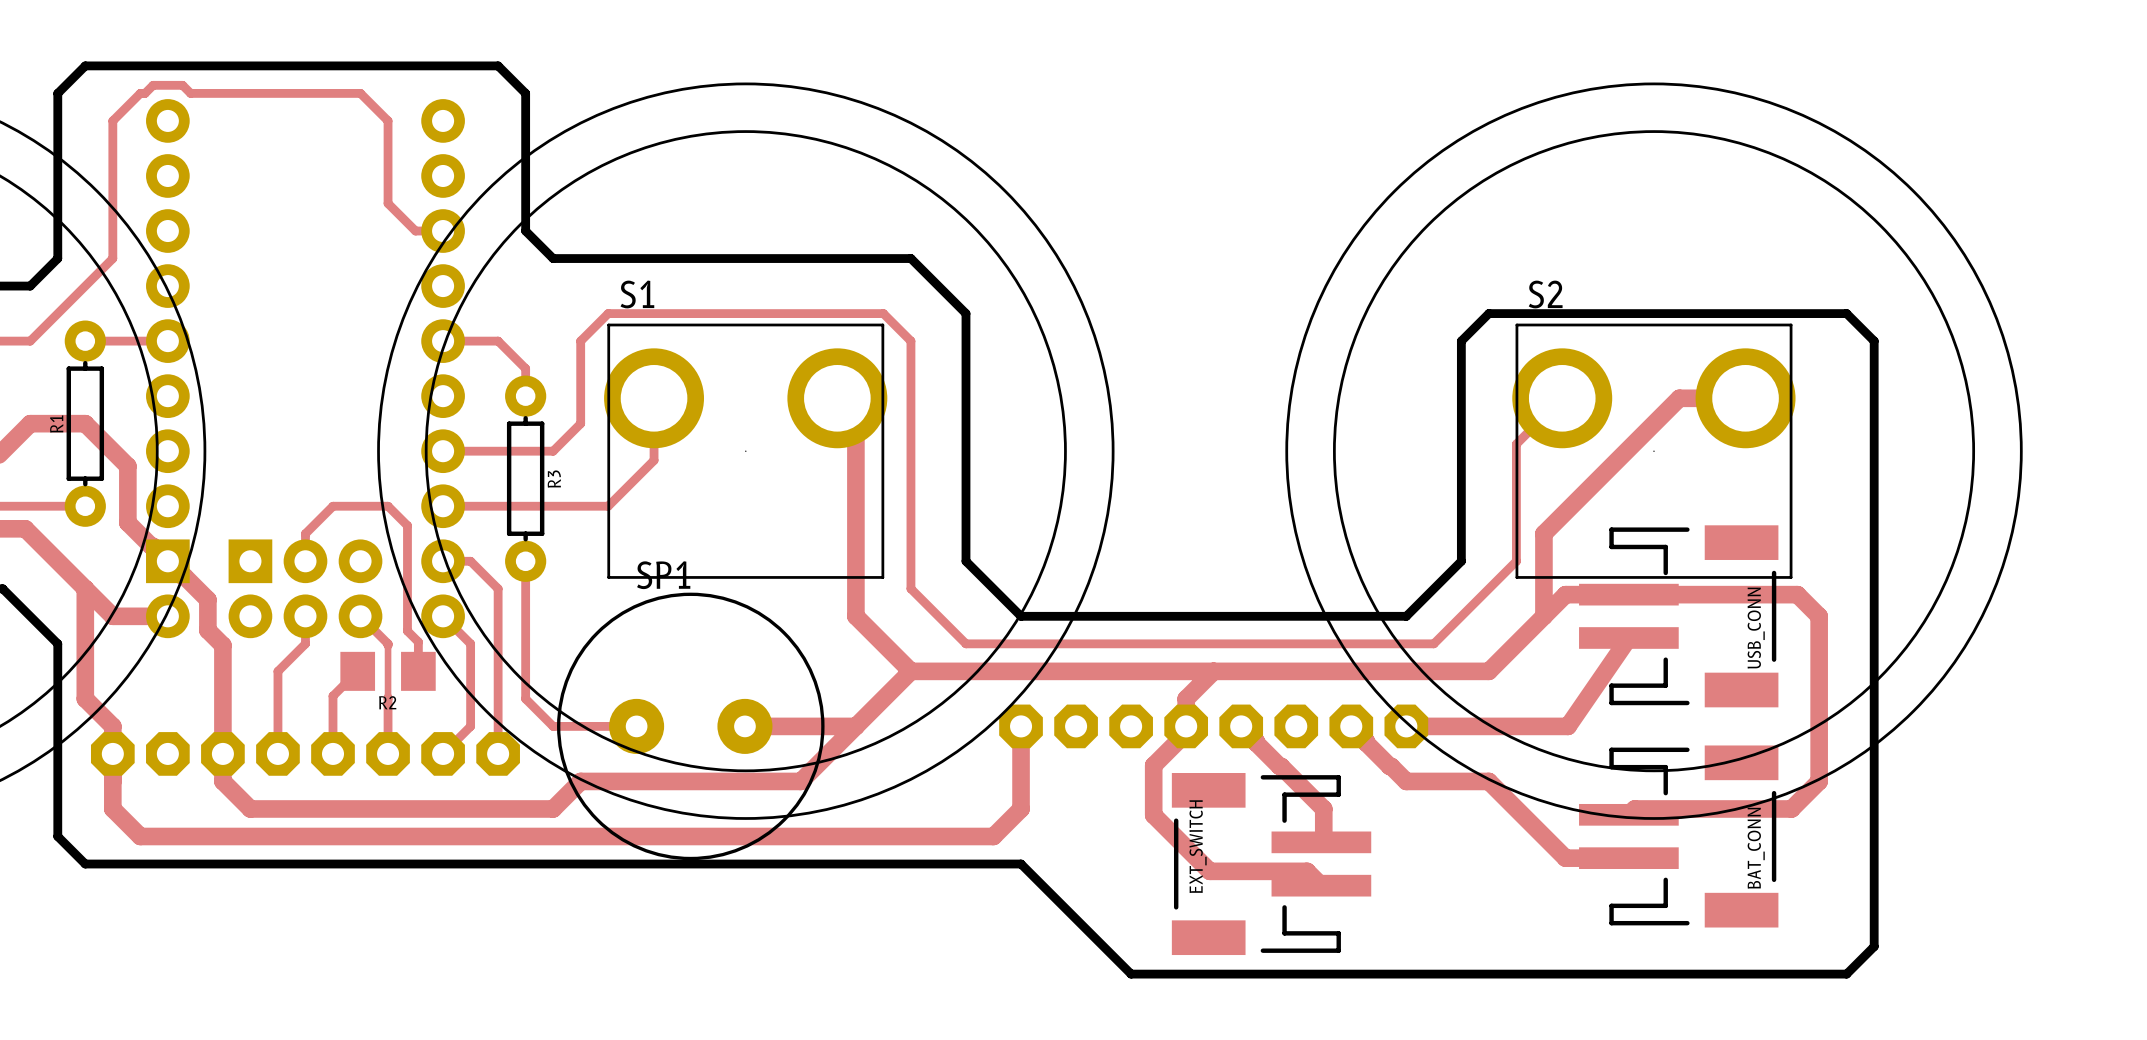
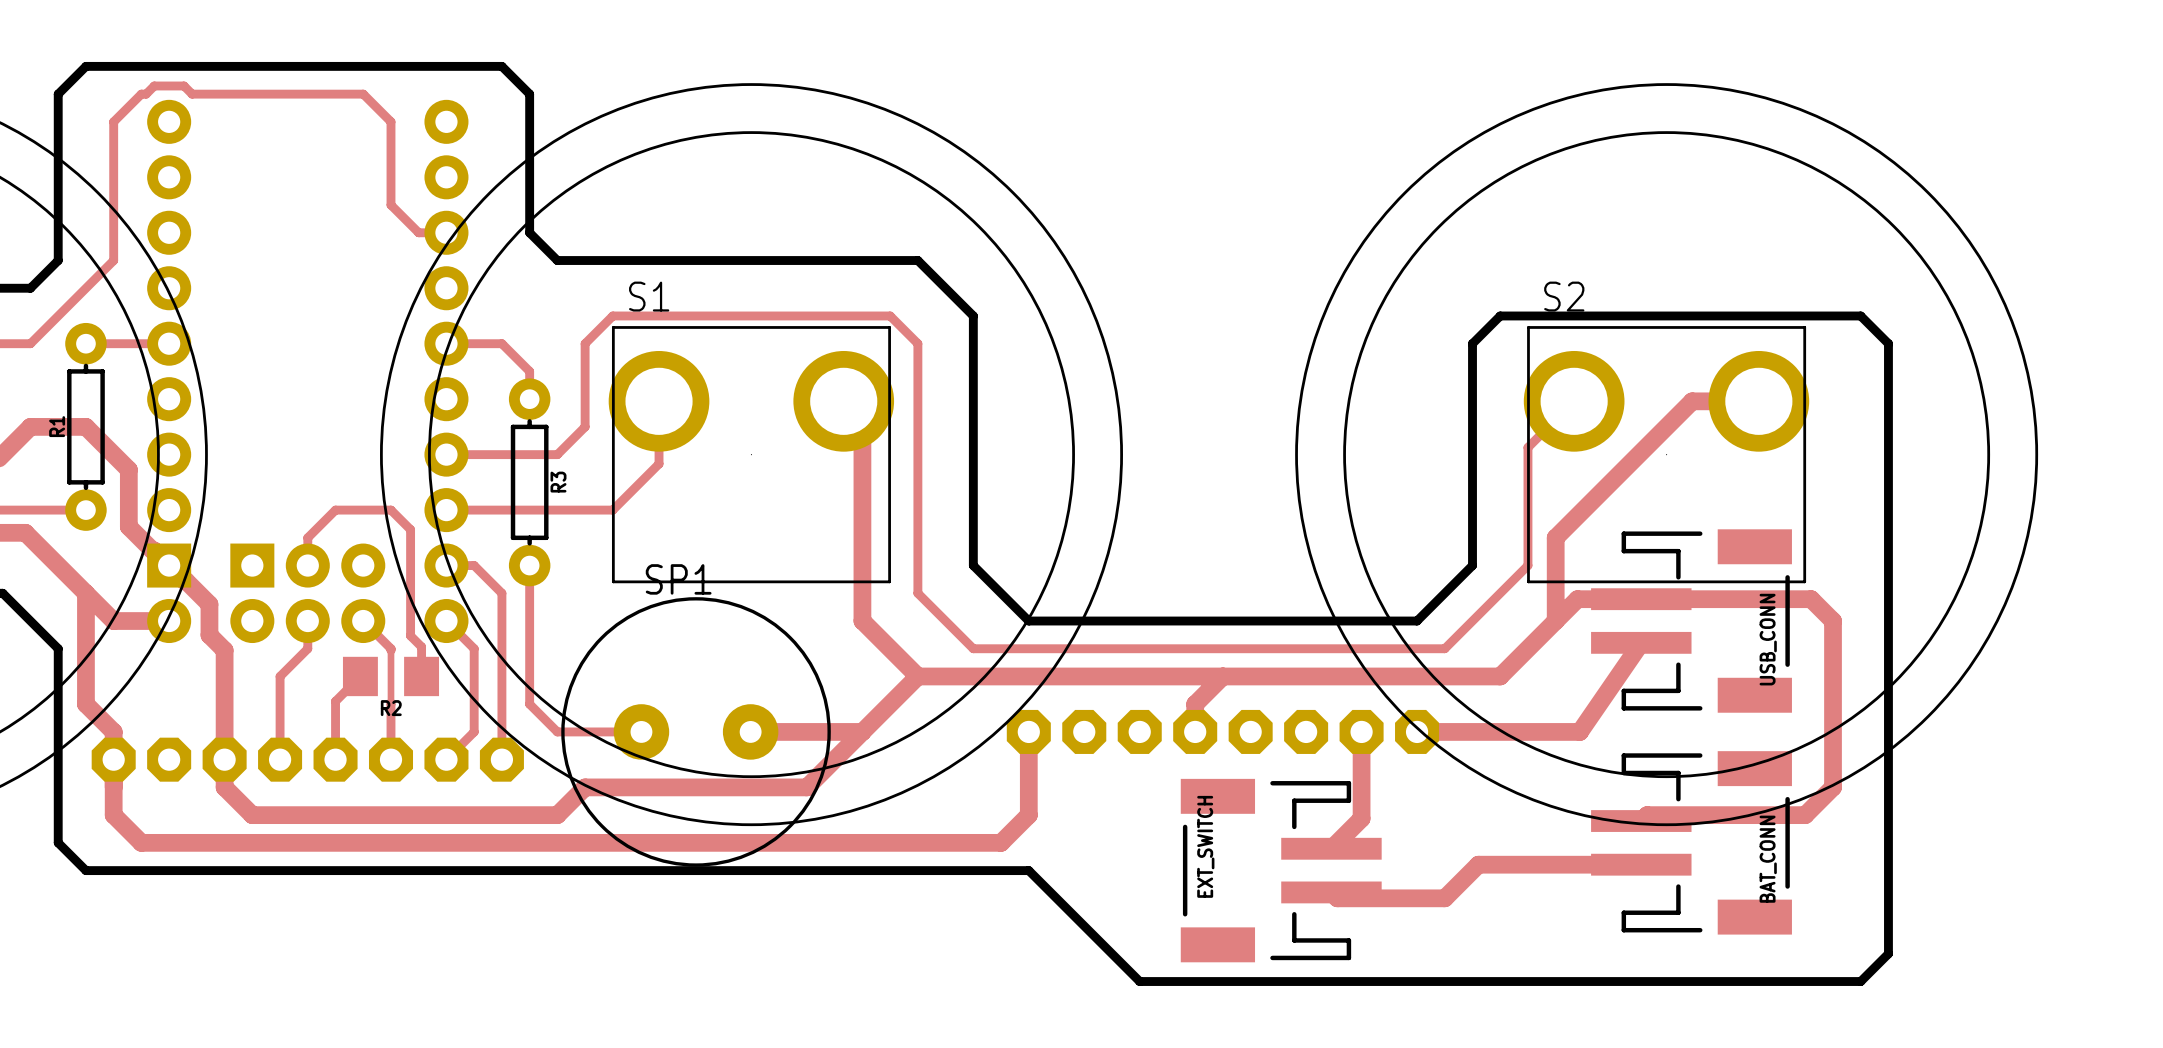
top track: (1186, 726) (1186, 733) (1153, 765) (1153, 815) (1209, 871) (1307, 871) (1321, 885) -> none
top track: (1241, 726) (1323, 808) (1323, 839) -> (1361, 731) (1361, 818) (1333, 846)
top track: (1351, 726) (1406, 781) (1488, 781) (1565, 858) -> (1331, 892) (1337, 898) (1444, 898) (1478, 864) (1577, 864)

